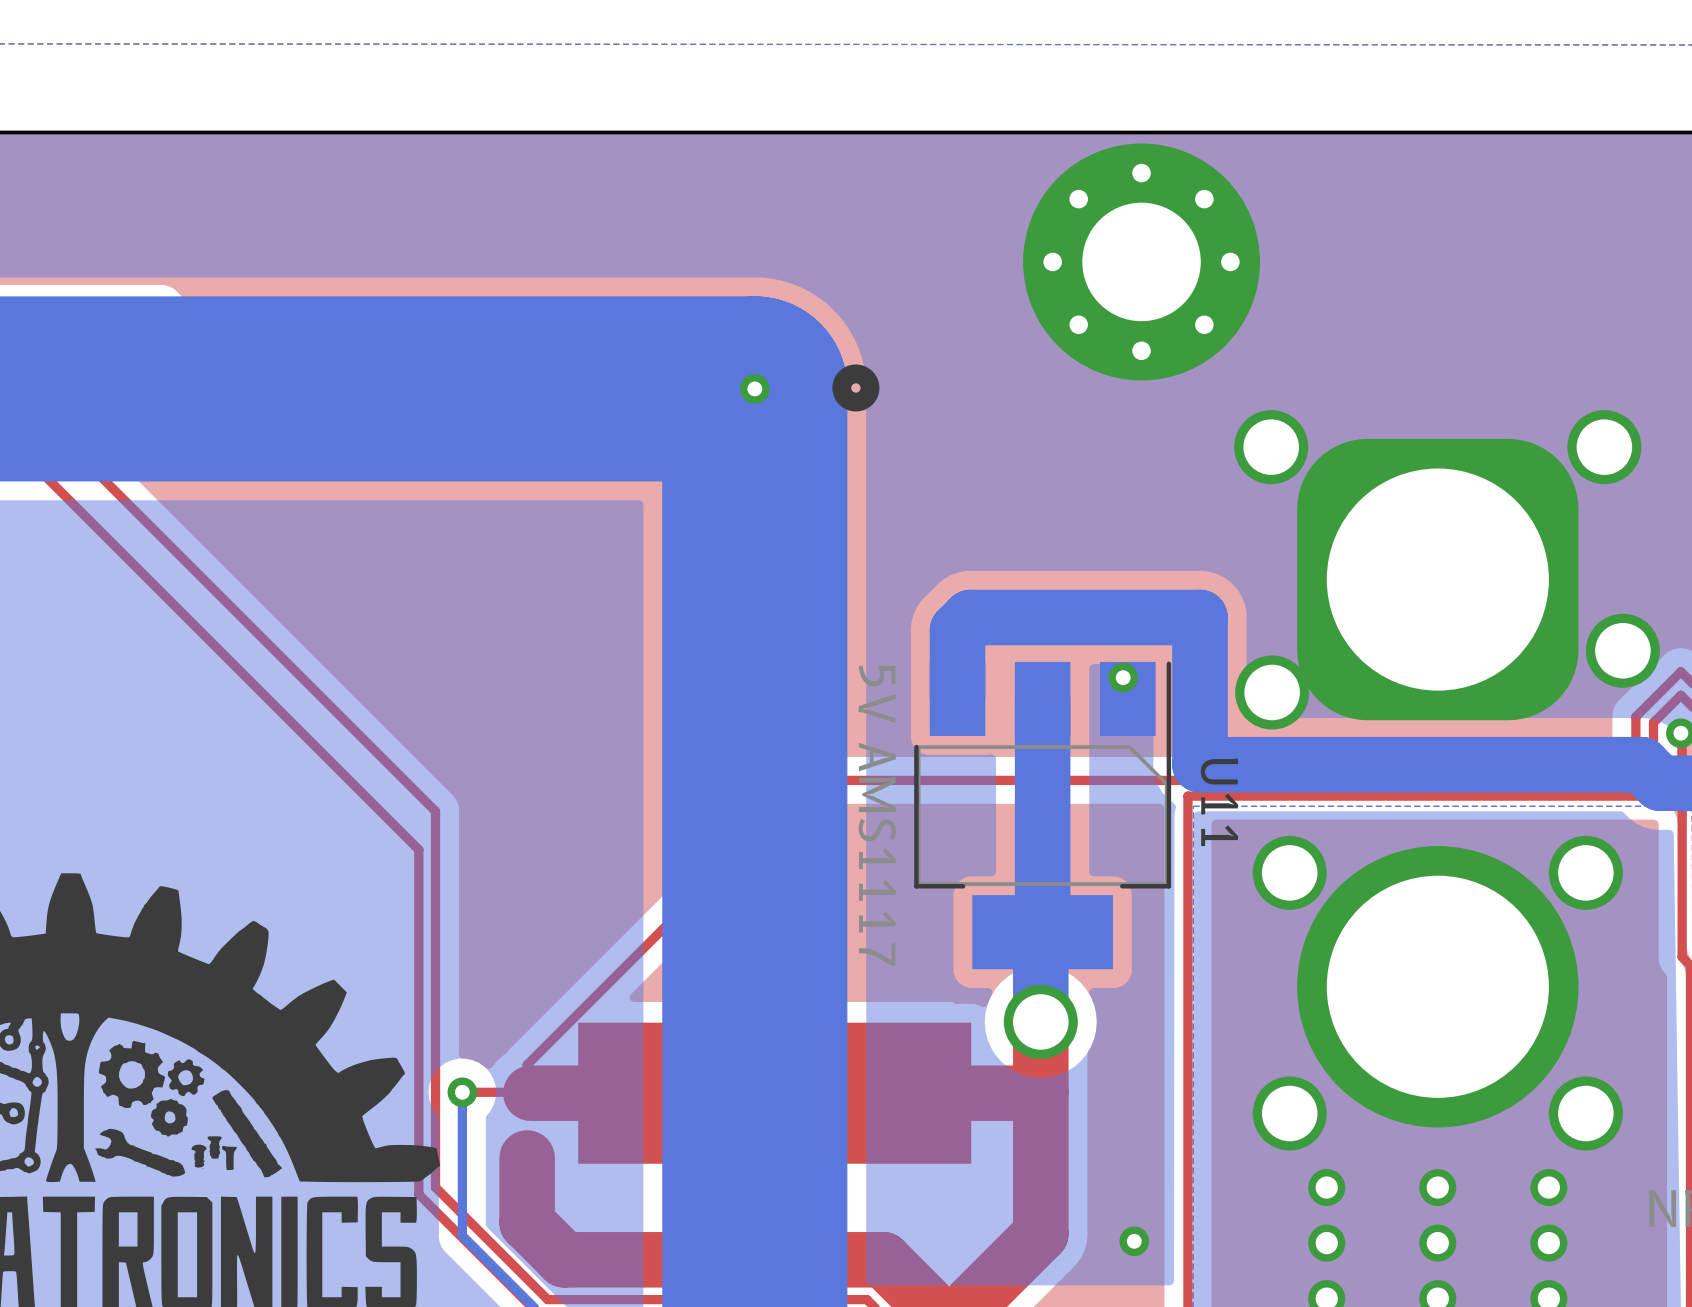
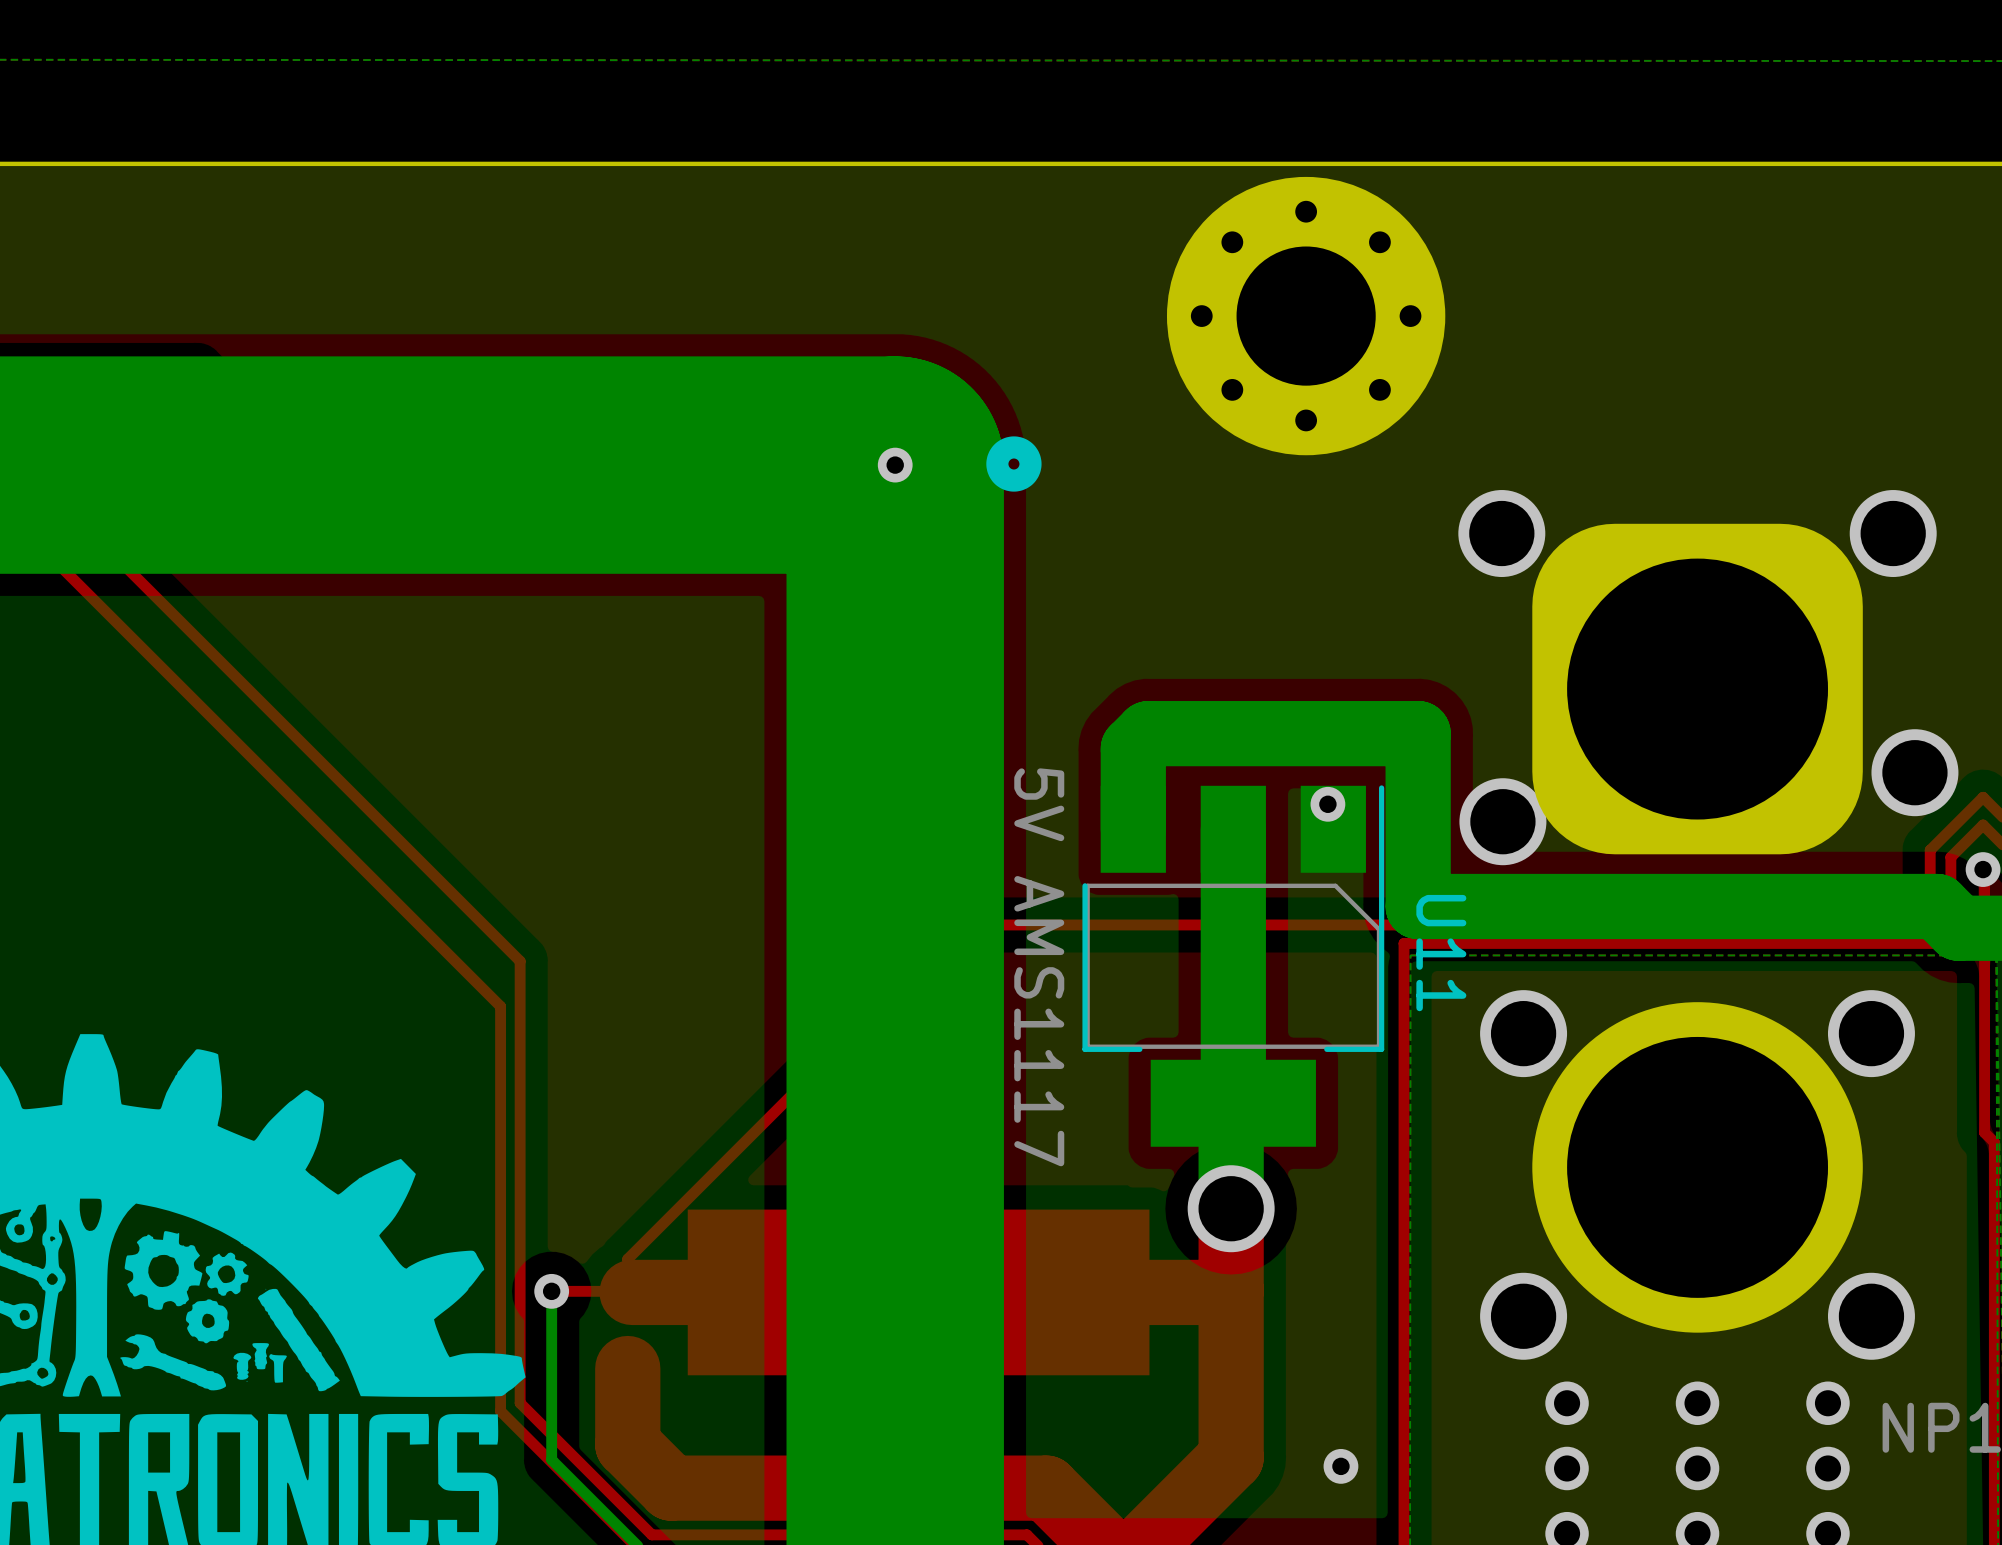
part position: (1141, 261) -> (1306, 316)

